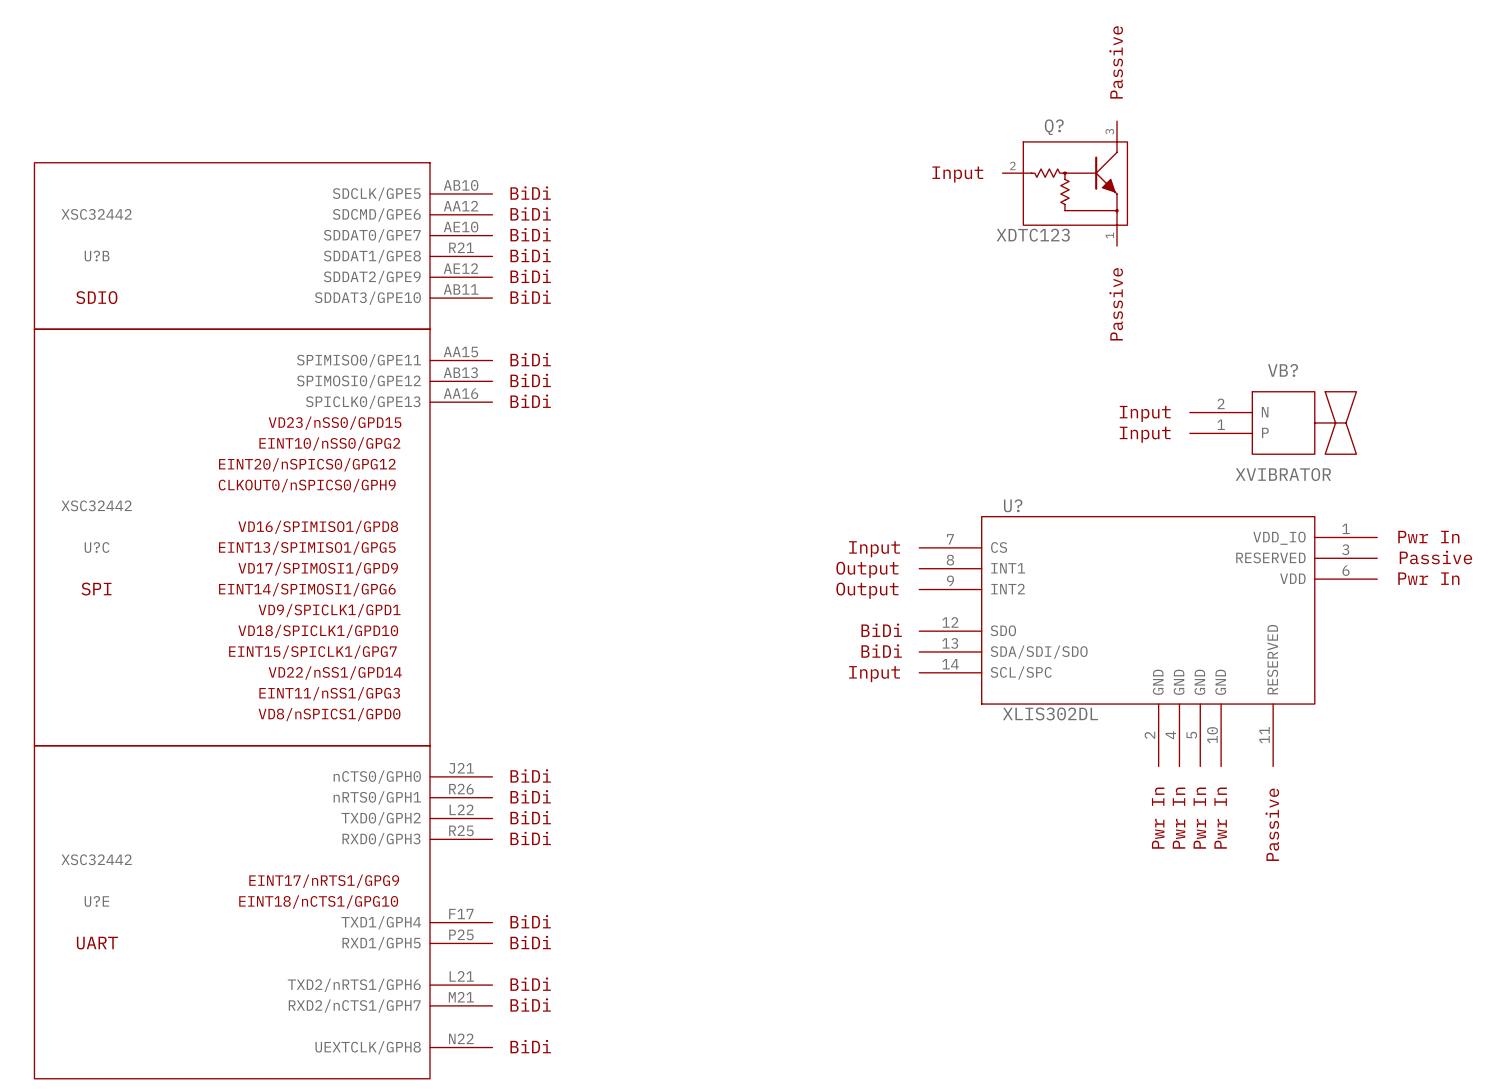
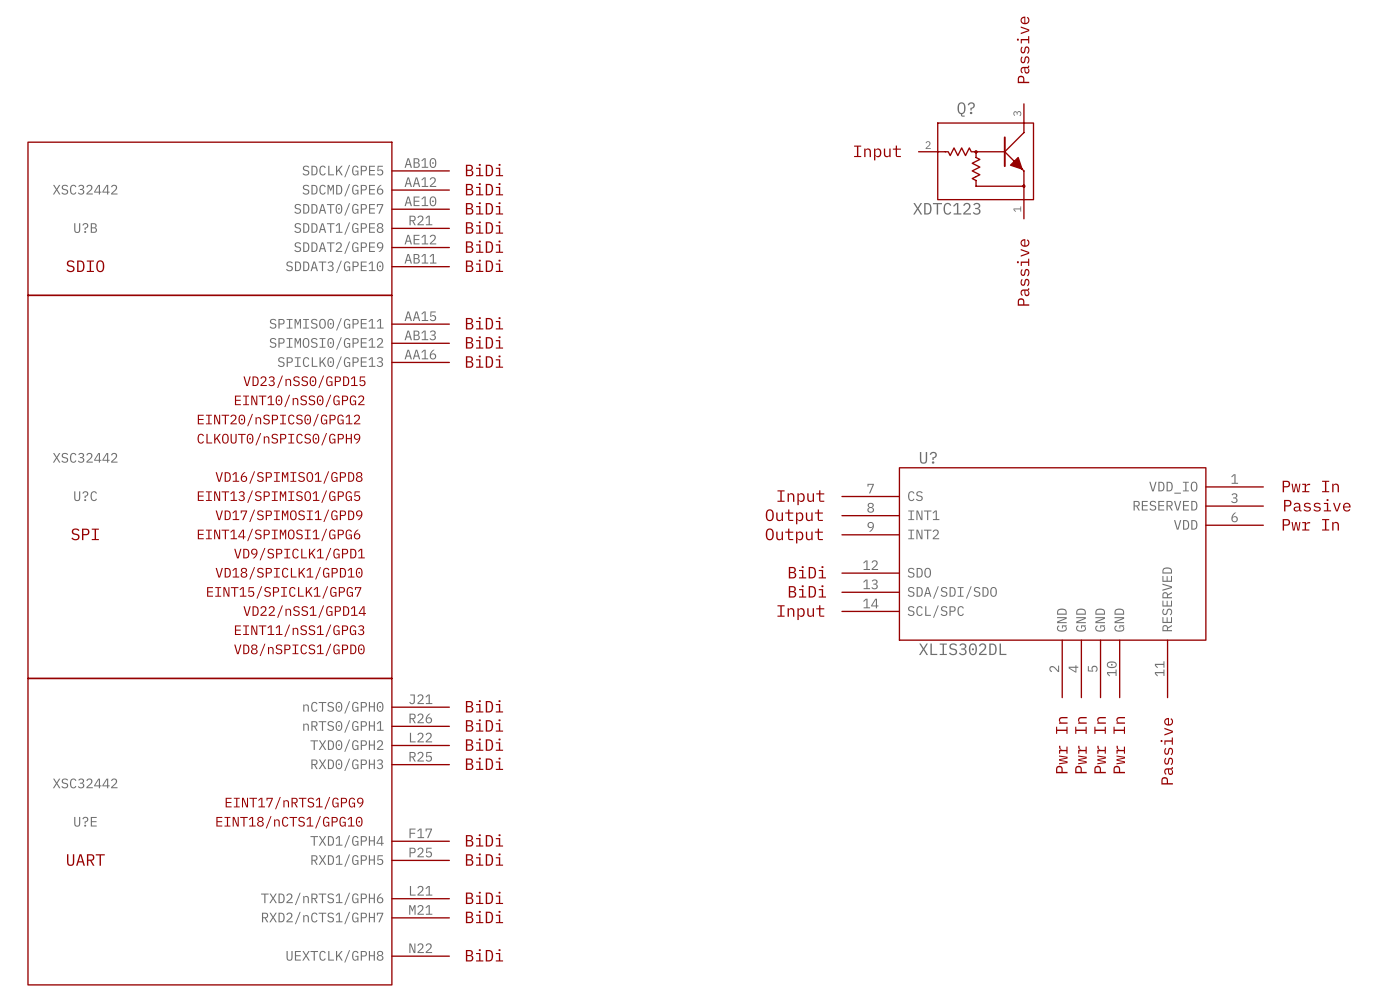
VB?: XVIBRATOR (1273, 422) -> none

